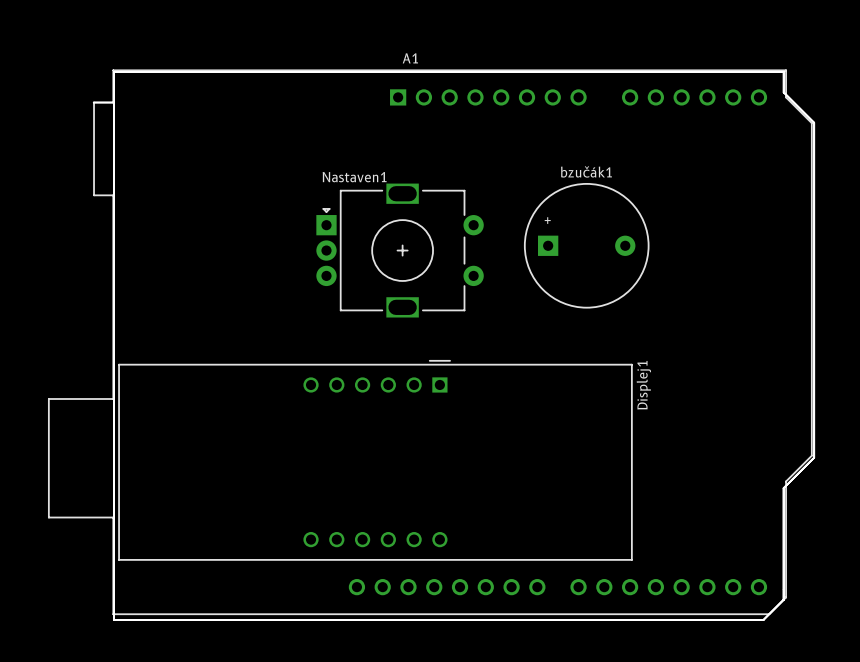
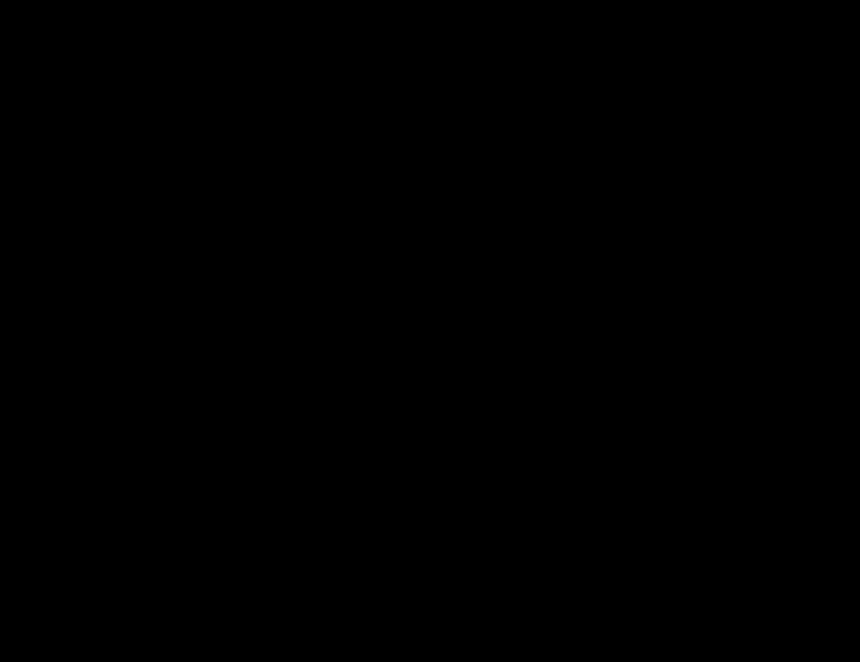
board edge: (114, 72) (114, 620) (763, 620) (783, 599) (783, 488) (814, 457) (814, 122) (783, 92) (783, 72) (114, 72) -> none
bzučák1: (586, 245) -> none
Nastaven1: (400, 250) -> none
A1: (430, 342) -> none
Displej1: (375, 460) -> none

